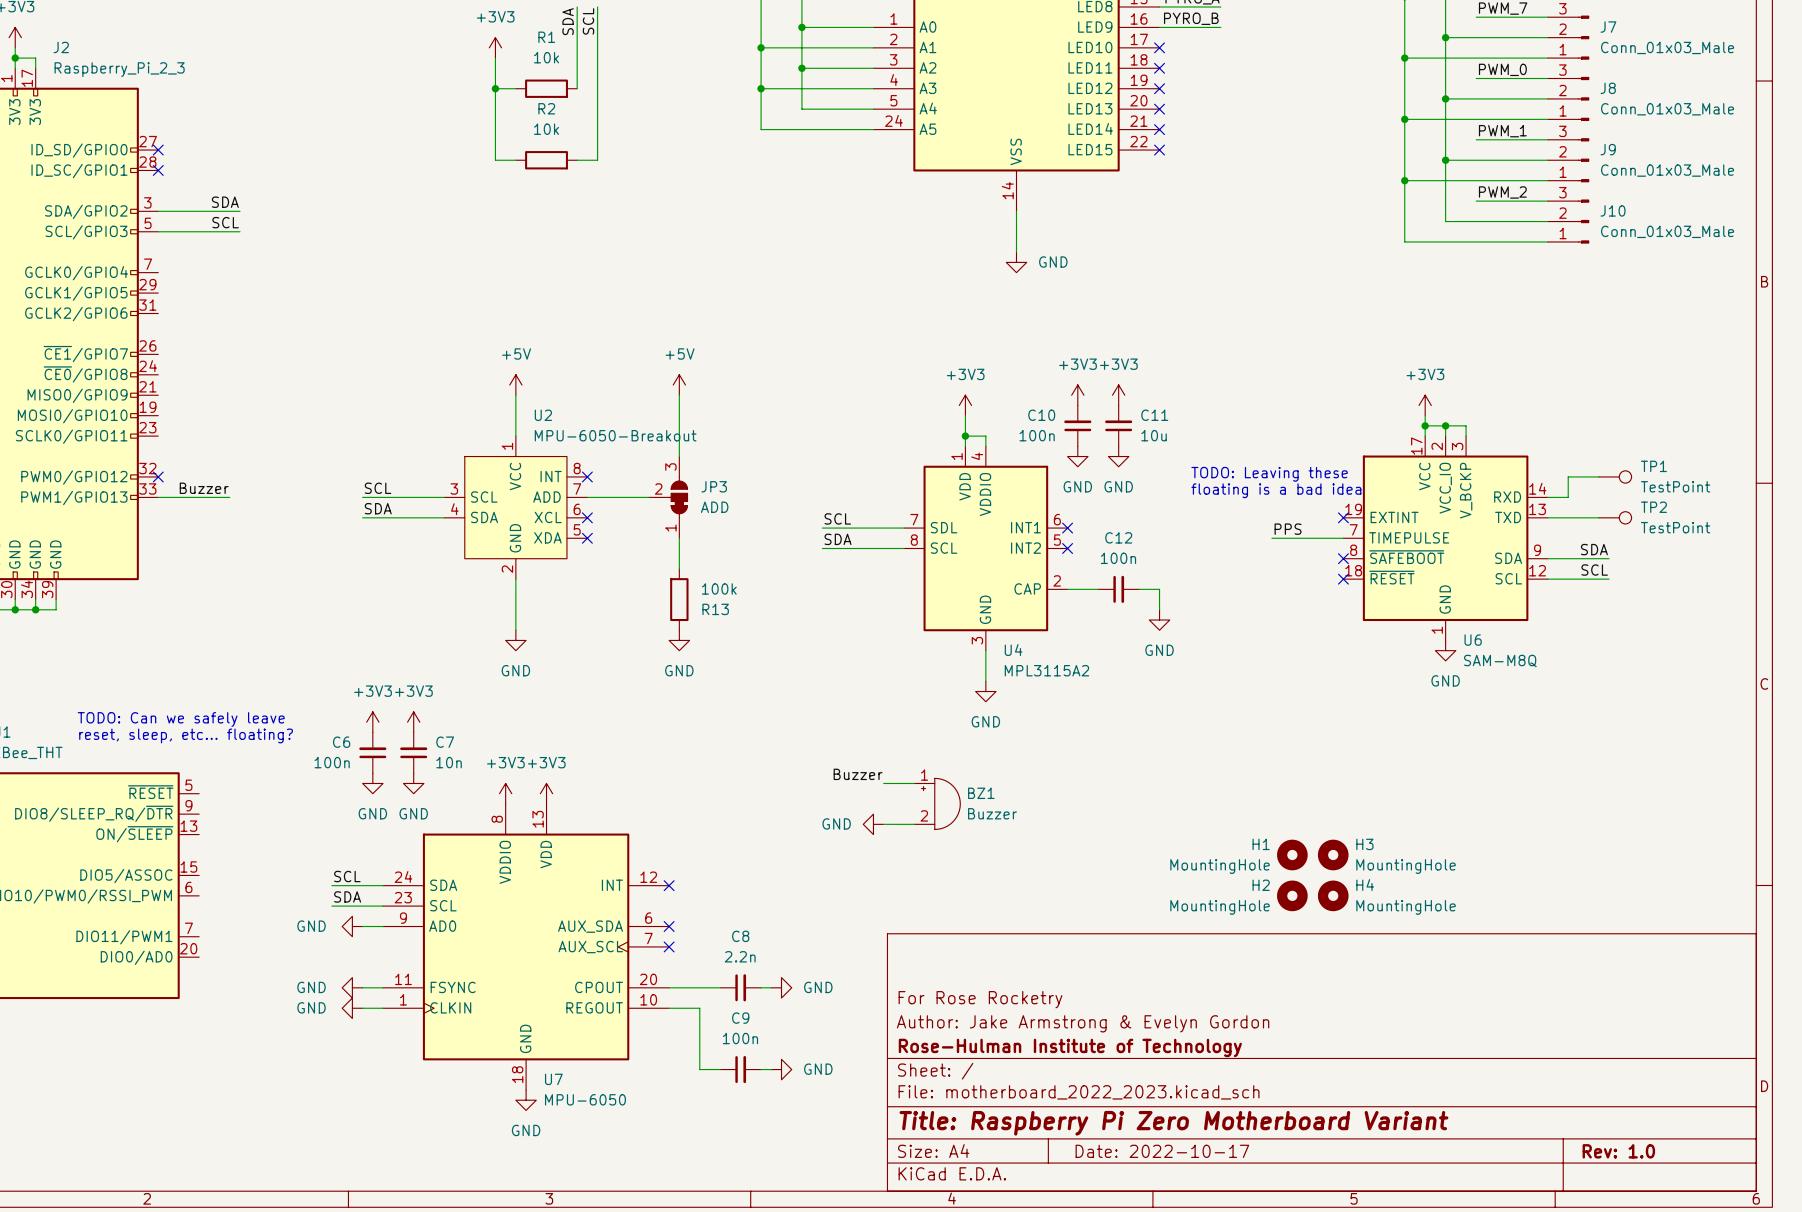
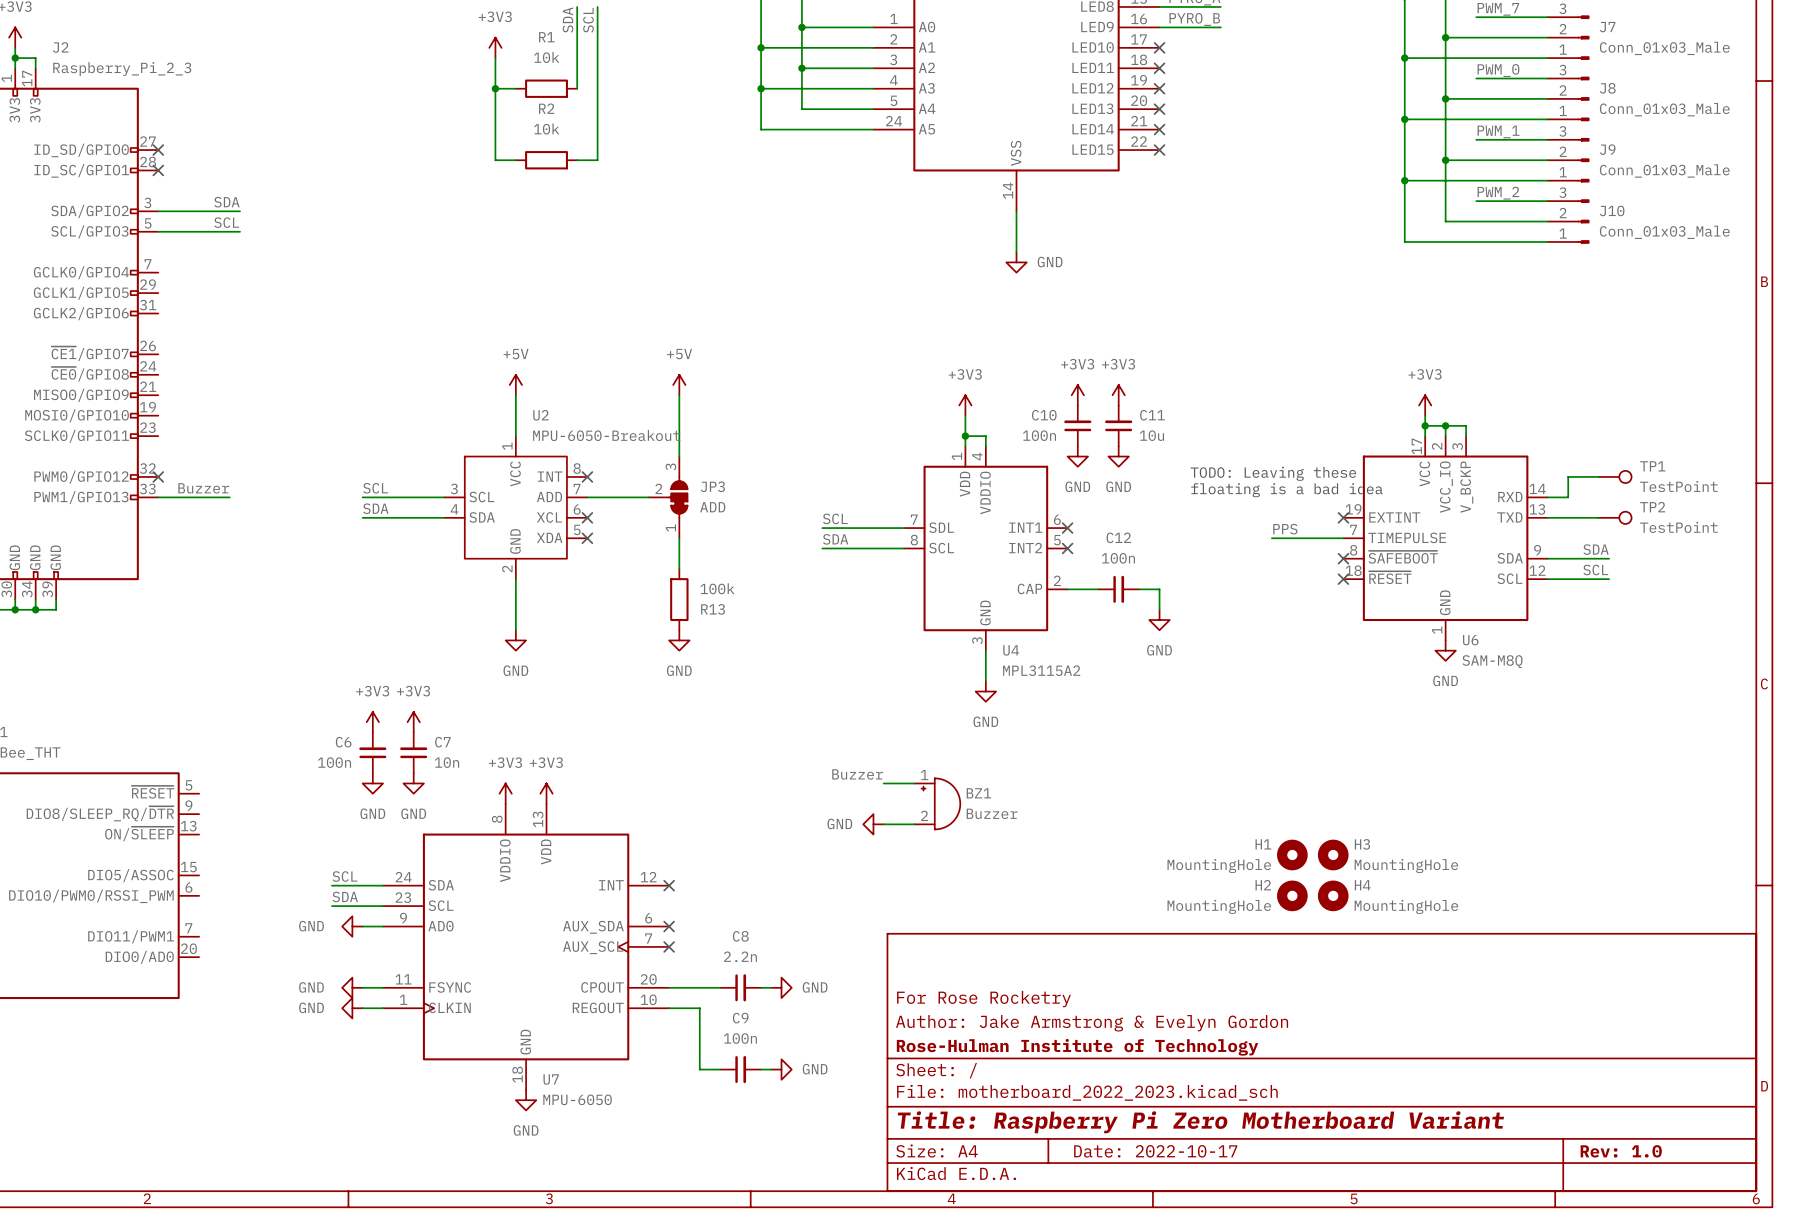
text: TODO: Can we safely leave (181, 719) -> none
text: reset, sleep, etc... floating? (186, 735) -> none

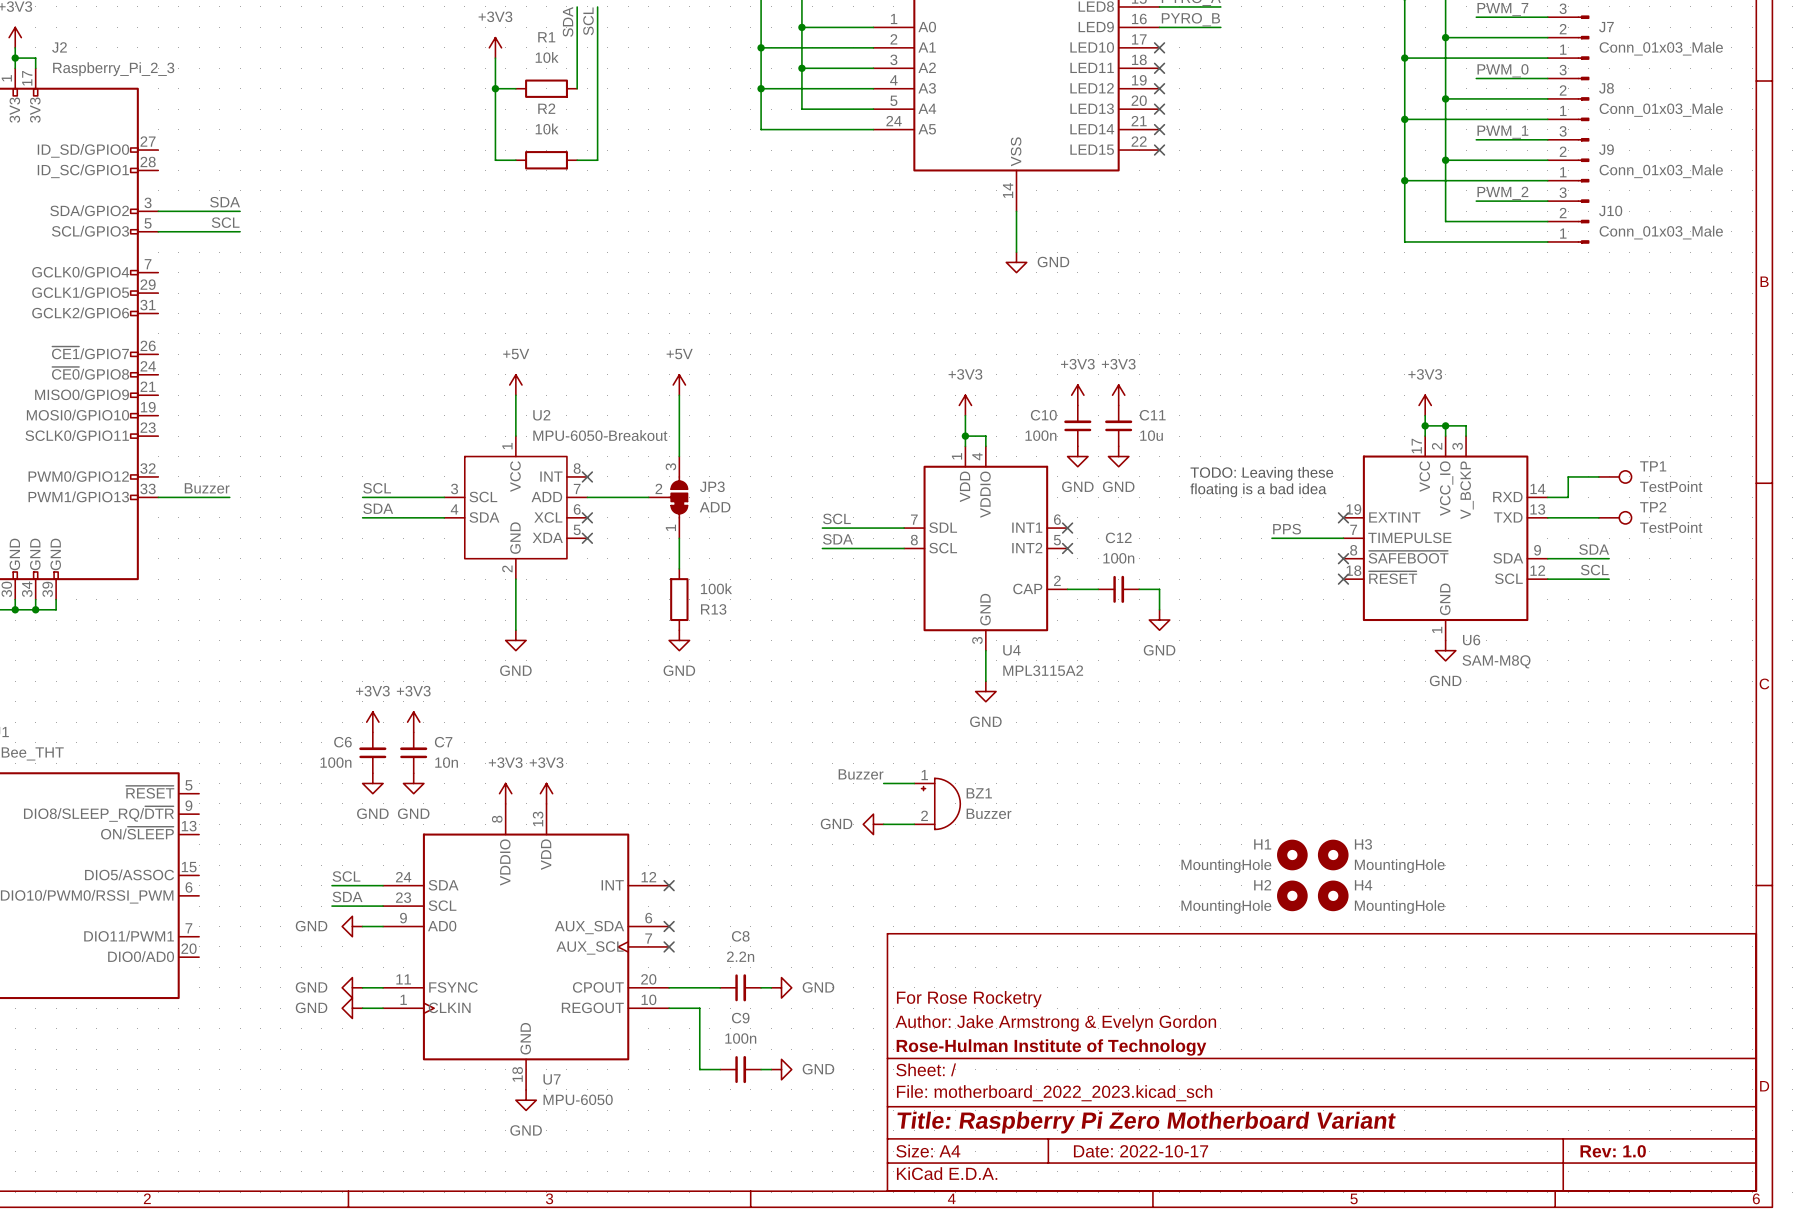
no-connect mark: (158, 150) -> none
no-connect mark: (158, 170) -> none
no-connect mark: (158, 476) -> none

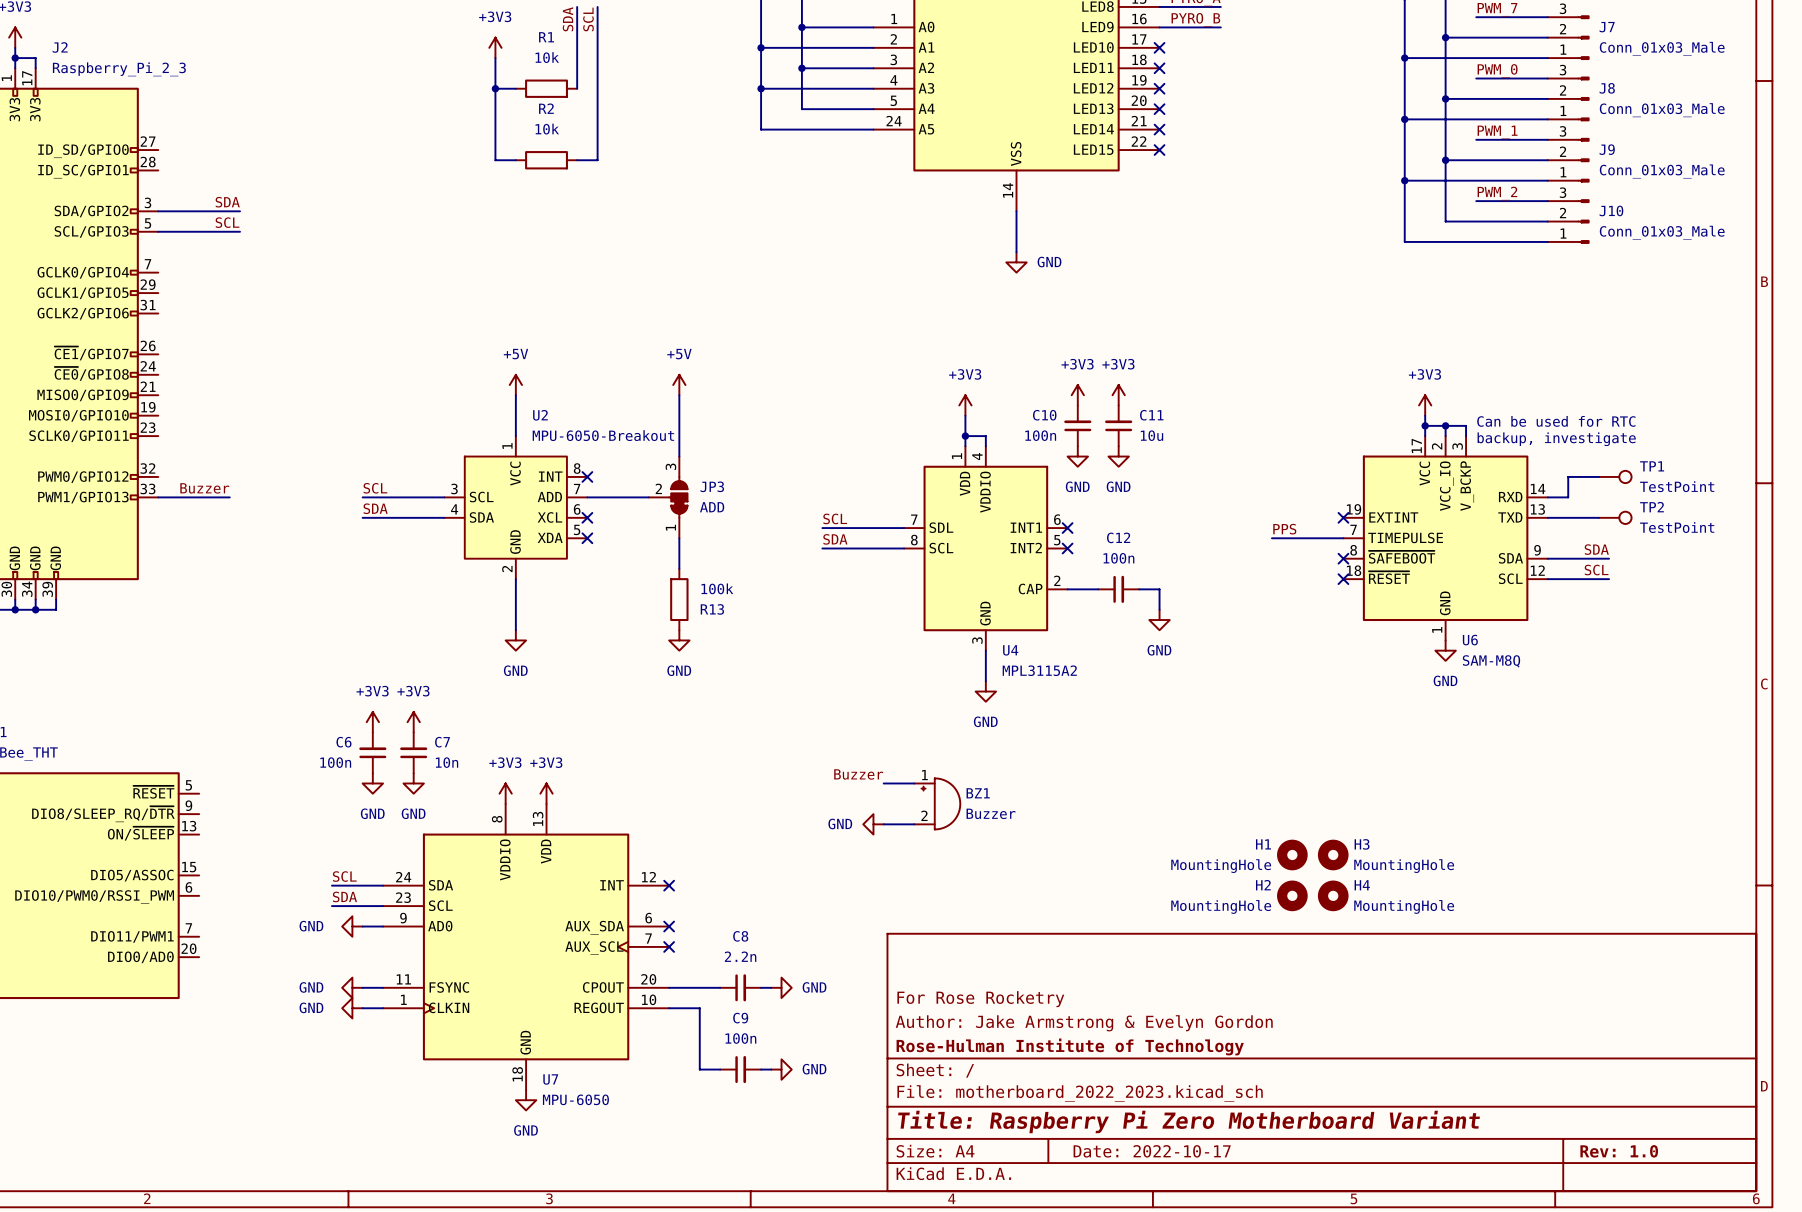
text: none -> Can be used for RTC (1556, 421)
text: none -> backup, investigate (1556, 439)
text: TODO: Leaving these (1261, 473) -> none
text: floating is a bad idea (1258, 490) -> none

